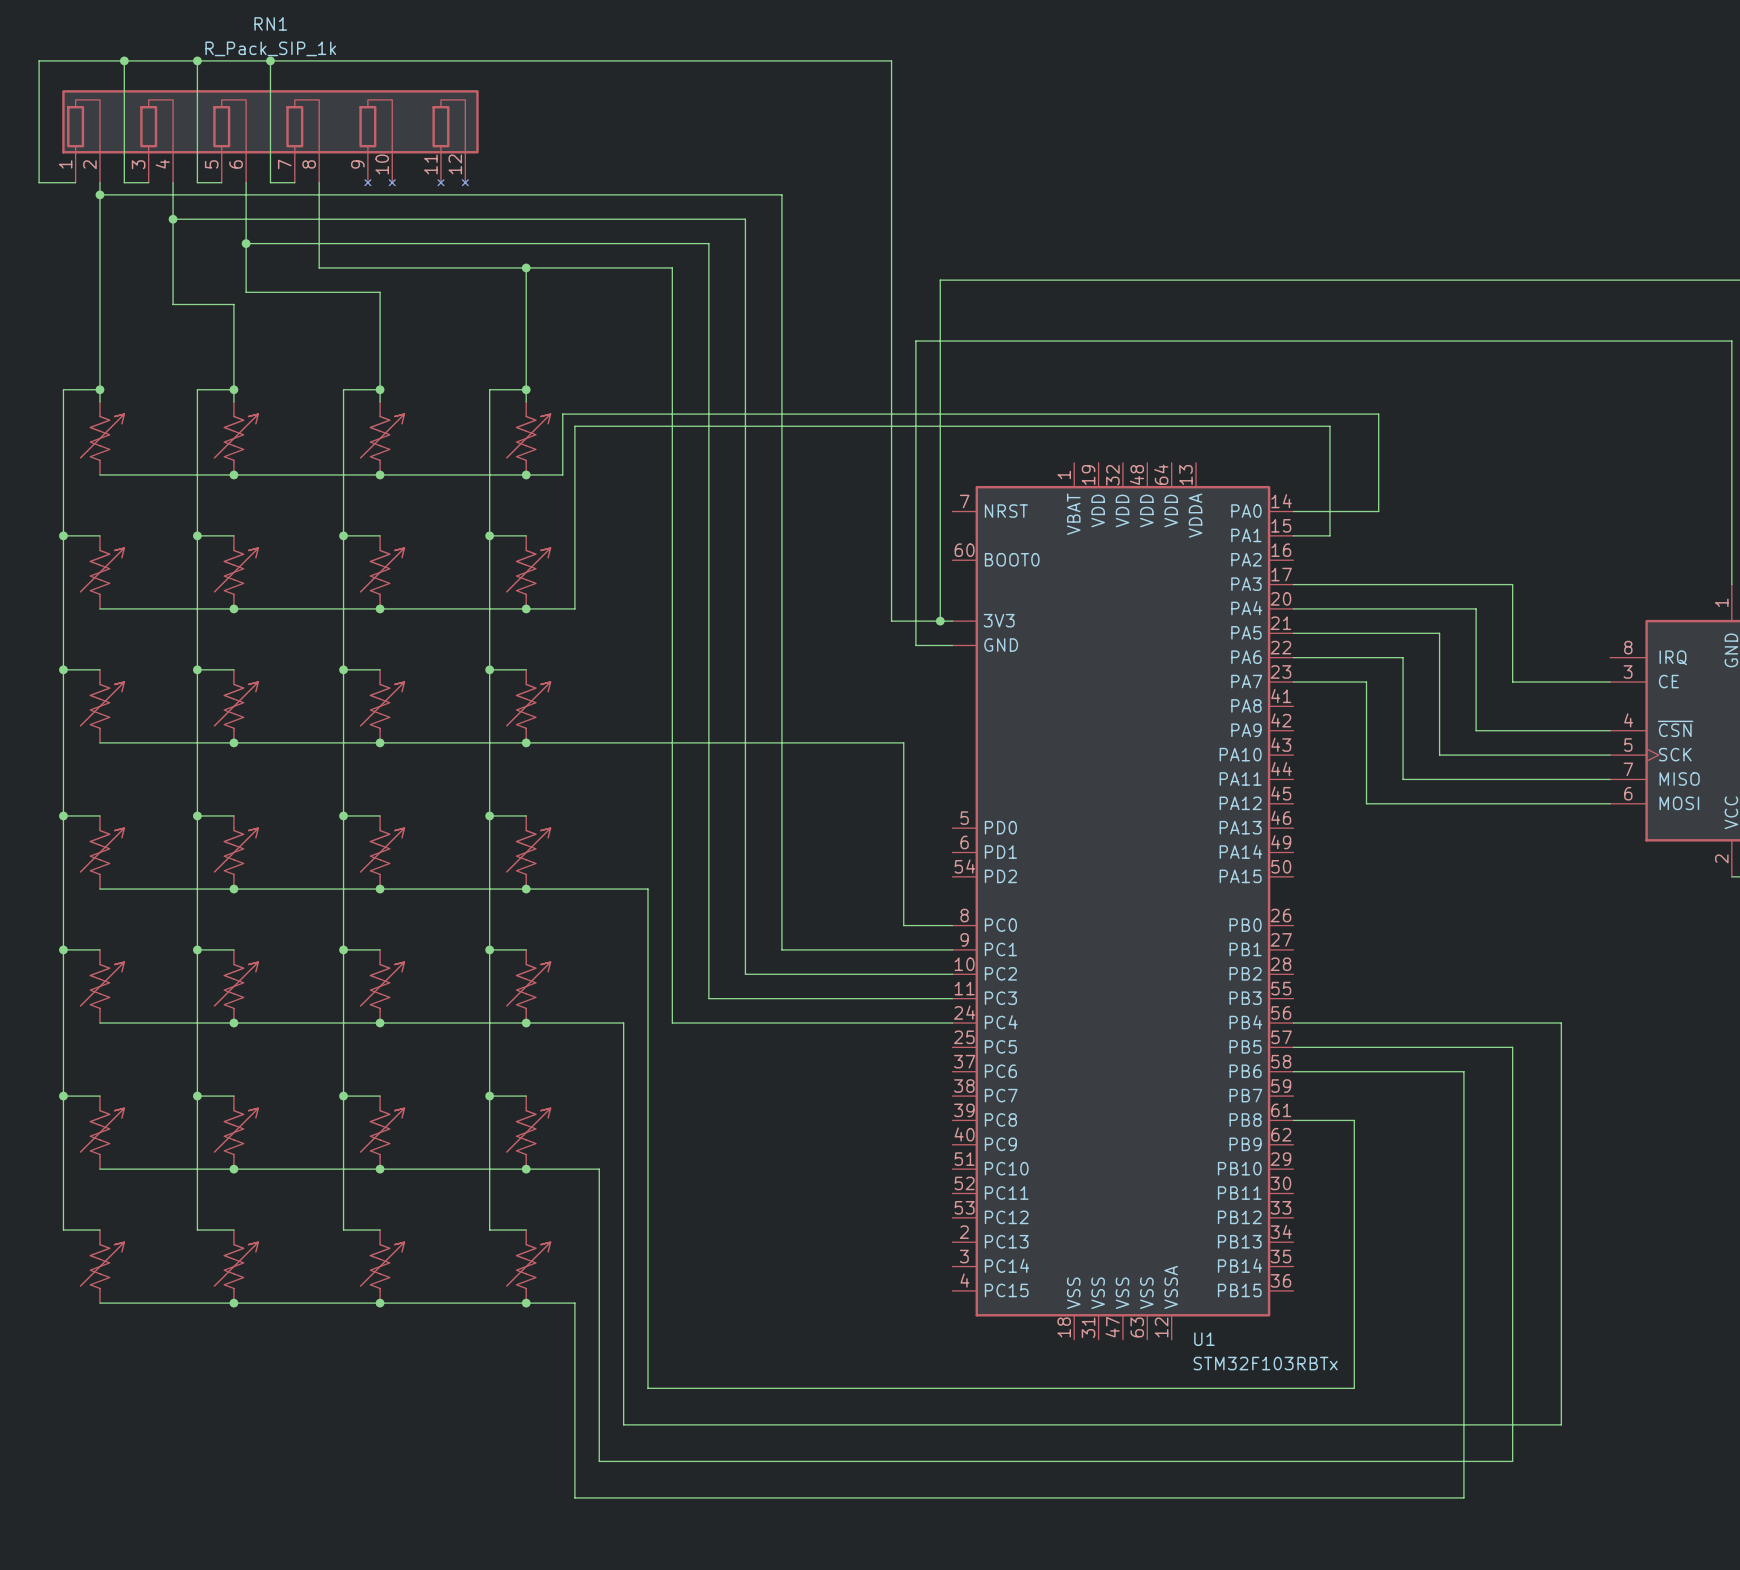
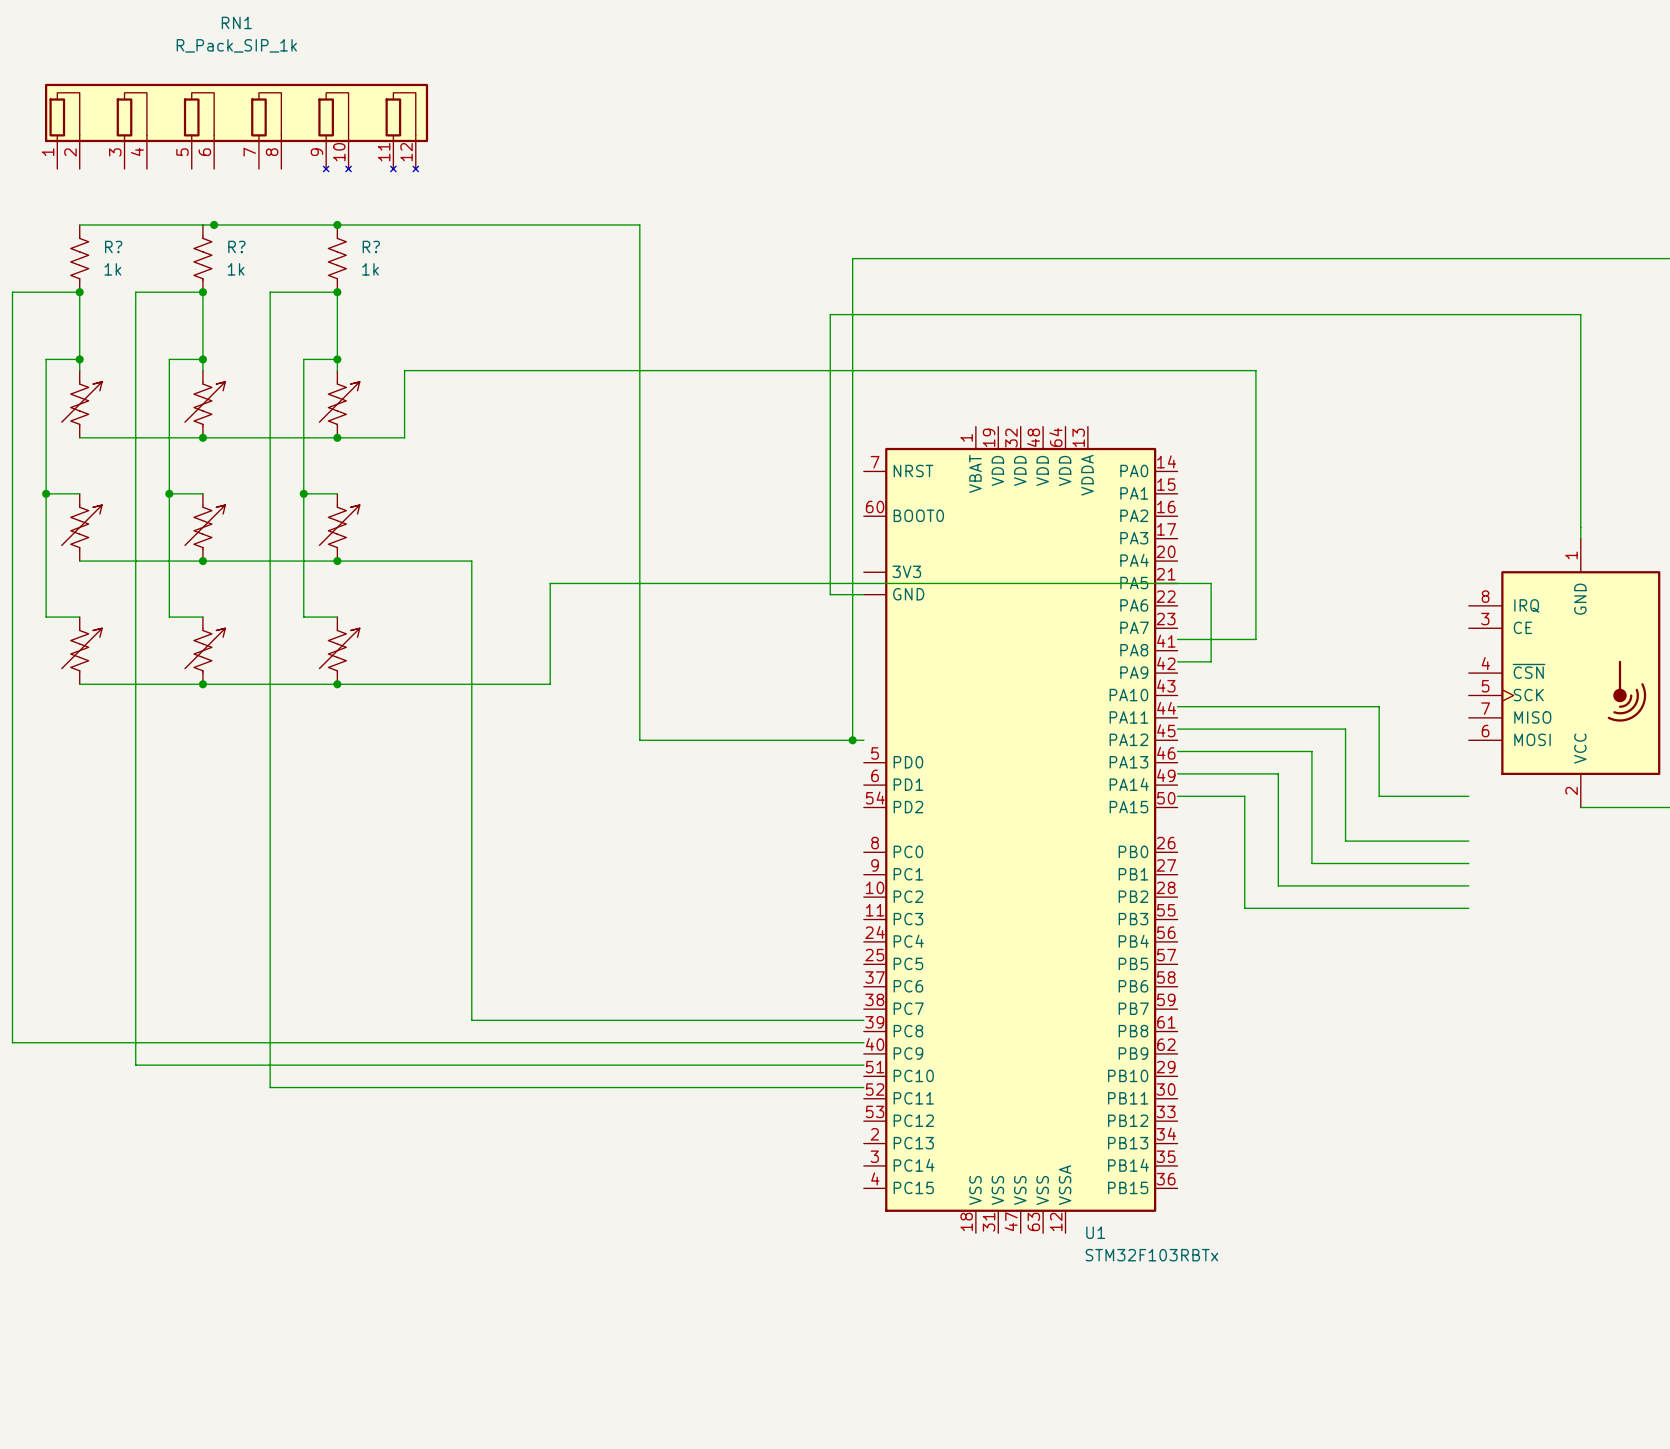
wire: (124, 60) (124, 182) (148, 182) -> none
junction: (124, 60) -> none
wire: (197, 60) (197, 182) (221, 182) -> none
junction: (197, 60) -> none
wire: (270, 60) (270, 182) (294, 182) -> none
junction: (270, 60) -> none
wire: (75, 182) (39, 182) (39, 60) (891, 60) (891, 621) (952, 621) -> none
wire: (99, 182) (99, 316) -> (863, 1042) (12, 1042) (12, 292) (79, 292)
wire: (173, 182) (173, 304) (233, 304) (233, 316) -> (863, 1065) (135, 1065) (135, 292) (202, 292)
wire: (246, 182) (246, 292) (380, 292) (380, 316) -> (863, 1087) (270, 1087) (270, 292) (337, 292)
wire: (319, 182) (319, 267) (672, 267) (672, 1023) (952, 1023) -> none
wire: (99, 194) (781, 194) (781, 949) (952, 949) -> none
junction: (99, 194) -> none
wire: (173, 219) (745, 219) (745, 974) (952, 974) -> none
junction: (173, 219) -> none
wire: none -> (79, 224) (214, 224)
junction: none -> (337, 224)
wire: (526, 267) (526, 401) -> none
junction: (526, 267) -> none
R?: none -> 1k (79, 258)
R?: none -> 1k (202, 258)
R?: none -> 1k (337, 258)
junction: none -> (79, 292)
junction: none -> (202, 292)
junction: none -> (337, 292)
wire: (526, 389) (489, 389) (489, 1230) (526, 1230) -> none
junction: (526, 389) -> none
wire: (1378, 414) (562, 414) (562, 474) (453, 474) -> (1255, 381) (1255, 370) (404, 370) (404, 437)
part: (528, 438) -> none
junction: (526, 474) -> none
wire: (1293, 511) (1378, 511) -> (1177, 639) (1255, 639) (1255, 471)
wire: (489, 535) (526, 535) -> none
junction: (489, 535) -> none
wire: (1293, 535) (1329, 535) (1329, 426) (574, 426) (574, 608) (526, 608) -> (863, 1020) (471, 1020) (471, 561)
part: (528, 572) -> none
wire: (1293, 584) (1512, 584) (1512, 682) (1610, 682) -> (1177, 706) (1379, 706) (1379, 796) (1468, 796)
junction: (526, 608) -> none
wire: (1293, 608) (1476, 608) (1476, 730) (1610, 730) -> (1177, 729) (1345, 729) (1345, 841) (1468, 841)
wire: none -> (852, 572) (852, 740)
junction: (940, 621) -> none
wire: (1329, 633) (1439, 633) (1439, 755) (1610, 755) -> (1211, 583) (1211, 661) (1177, 661)
wire: (1293, 657) (1403, 657) (1403, 779) (1610, 779) -> (1177, 773) (1278, 773) (1278, 885) (1468, 885)
wire: (63, 669) (63, 1230) (99, 1230) -> none
junction: (63, 669) -> none
wire: (197, 669) (197, 1230) (233, 1230) -> none
junction: (197, 669) -> none
wire: (343, 669) (343, 1230) (380, 1230) -> none
junction: (343, 669) -> none
wire: (489, 669) (526, 669) -> none
junction: (489, 669) -> none
wire: (1293, 682) (1366, 682) (1366, 803) (1610, 803) -> (1177, 796) (1244, 796) (1244, 908) (1468, 908)
part: (528, 706) -> none
junction: (526, 742) -> none
wire: (611, 742) (903, 742) (903, 925) (952, 925) -> (550, 684) (550, 583) (1177, 583)
wire: (708, 803) (708, 998) (952, 998) -> (639, 740) (863, 740)
junction: none -> (852, 740)
wire: (63, 815) (99, 815) -> none
junction: (63, 815) -> none
wire: (197, 815) (233, 815) -> none
junction: (197, 815) -> none
wire: (343, 815) (380, 815) -> none
junction: (343, 815) -> none
wire: (489, 815) (526, 815) -> none
junction: (489, 815) -> none
wire: none -> (1177, 751) (1311, 751) (1311, 863) (1468, 863)
part: (102, 852) -> none
part: (236, 852) -> none
part: (382, 852) -> none
part: (528, 852) -> none
wire: (99, 889) (647, 889) (647, 1388) (1354, 1388) (1354, 1120) (1293, 1120) -> none
junction: (233, 889) -> none
junction: (380, 889) -> none
junction: (526, 889) -> none
wire: (63, 949) (99, 949) -> none
junction: (63, 949) -> none
wire: (197, 949) (233, 949) -> none
junction: (197, 949) -> none
wire: (343, 949) (380, 949) -> none
junction: (343, 949) -> none
wire: (489, 949) (526, 949) -> none
junction: (489, 949) -> none
part: (102, 986) -> none
part: (236, 986) -> none
part: (382, 986) -> none
part: (528, 986) -> none
wire: (99, 1023) (623, 1023) (623, 1424) (1561, 1424) (1561, 1023) (1293, 1023) -> none
junction: (233, 1023) -> none
junction: (380, 1023) -> none
junction: (526, 1023) -> none
wire: (1293, 1047) (1512, 1047) (1512, 1461) (599, 1461) (599, 1169) (99, 1169) -> none
wire: (1293, 1071) (1463, 1071) (1463, 1497) (574, 1497) (574, 1303) (99, 1303) -> none
wire: (63, 1096) (99, 1096) -> none
junction: (63, 1096) -> none
wire: (197, 1096) (233, 1096) -> none
junction: (197, 1096) -> none
wire: (343, 1096) (380, 1096) -> none
junction: (343, 1096) -> none
wire: (489, 1096) (526, 1096) -> none
junction: (489, 1096) -> none
part: (102, 1132) -> none
part: (236, 1132) -> none
part: (382, 1132) -> none
part: (528, 1132) -> none
junction: (233, 1169) -> none
junction: (380, 1169) -> none
junction: (526, 1169) -> none
part: (102, 1266) -> none
part: (236, 1266) -> none
part: (382, 1266) -> none
part: (528, 1266) -> none
junction: (233, 1303) -> none
junction: (380, 1303) -> none
junction: (526, 1303) -> none

